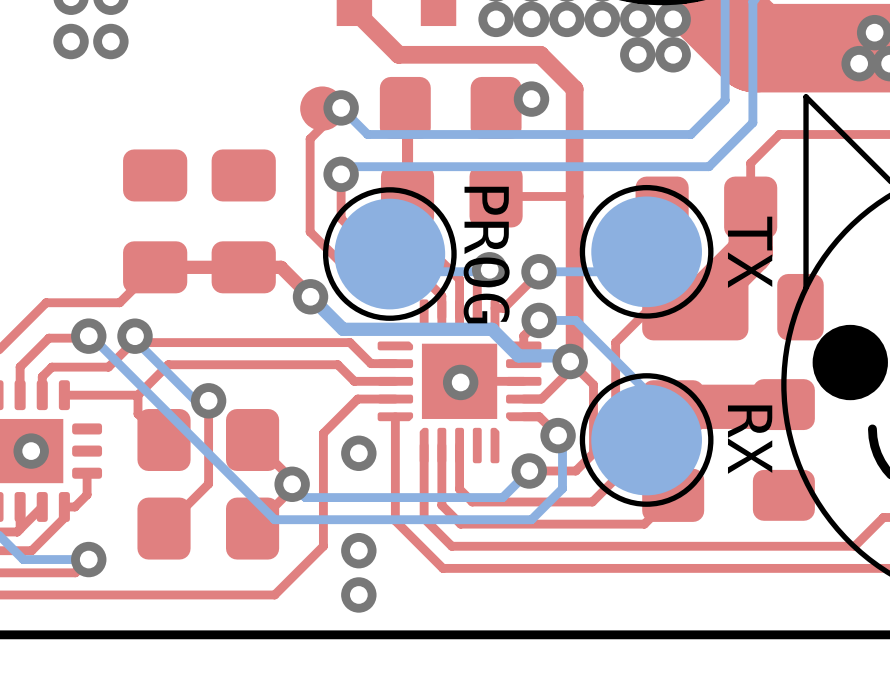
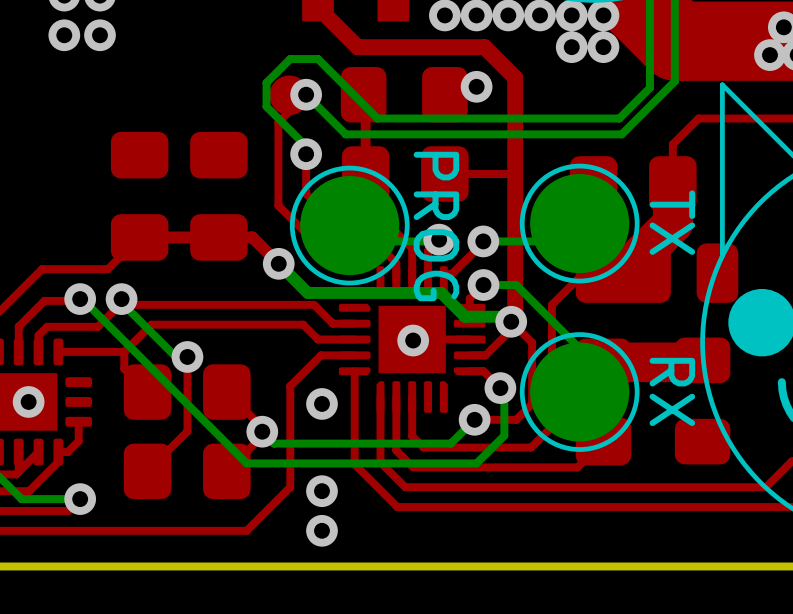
bottom track: (752, 92) (752, 122) (708, 166) (348, 166) (341, 174) -> (674, 81) (621, 134) (345, 134) (329, 118)
bottom track: (420, 134) (367, 134) -> (377, 118) (318, 59) (290, 59) (266, 82) (266, 106) (306, 146) (306, 154)

